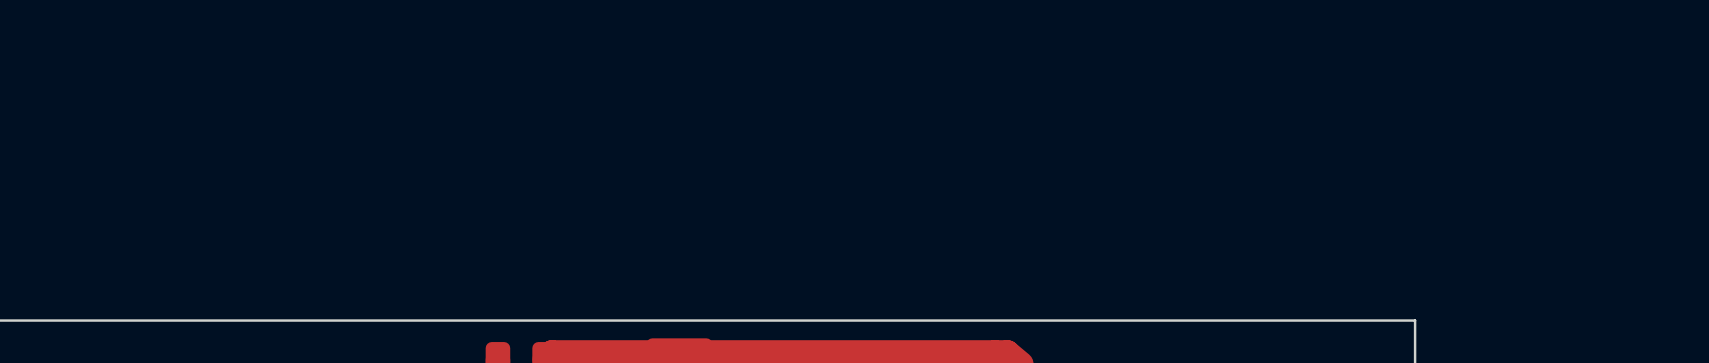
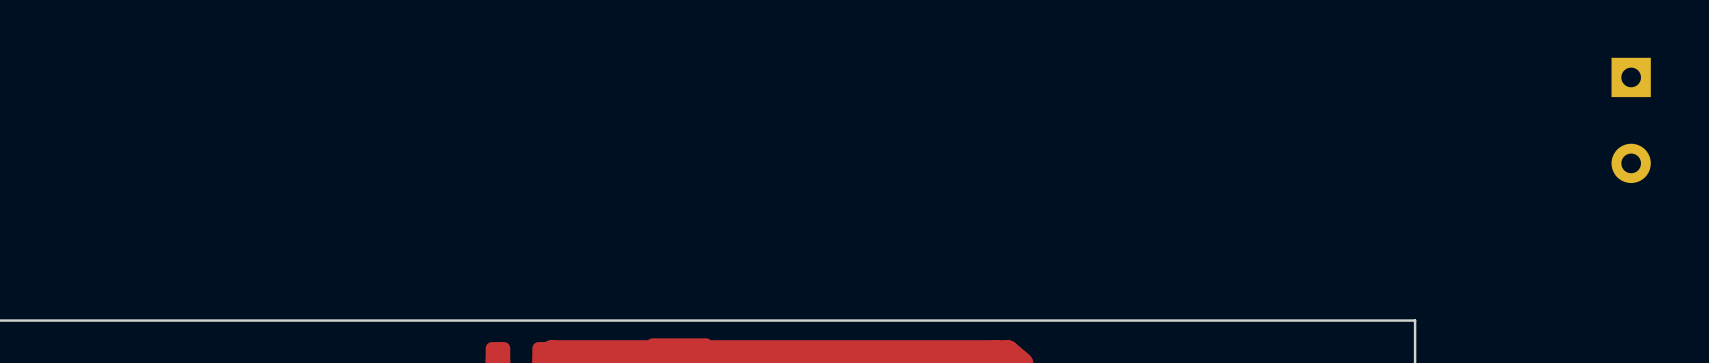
part: none -> (1631, 120)

